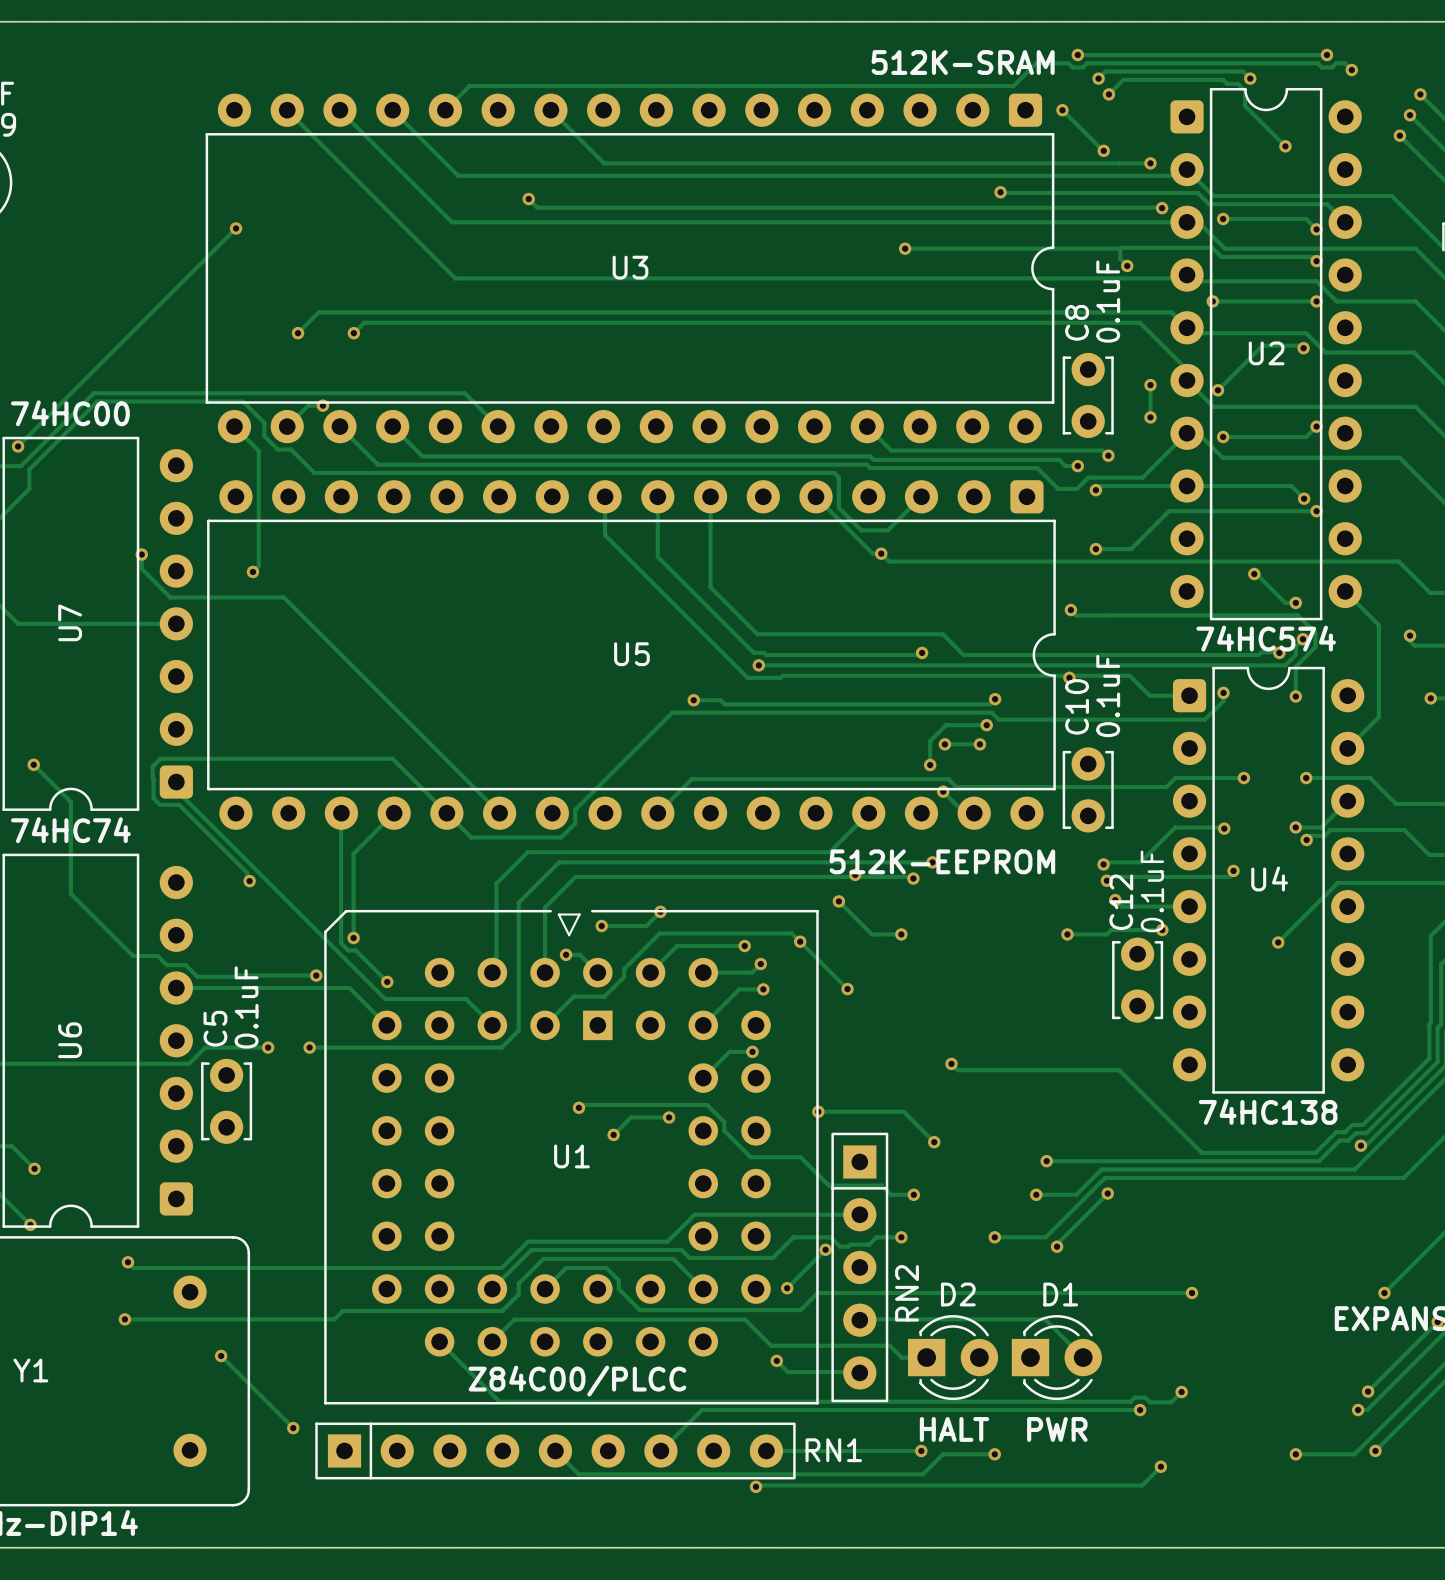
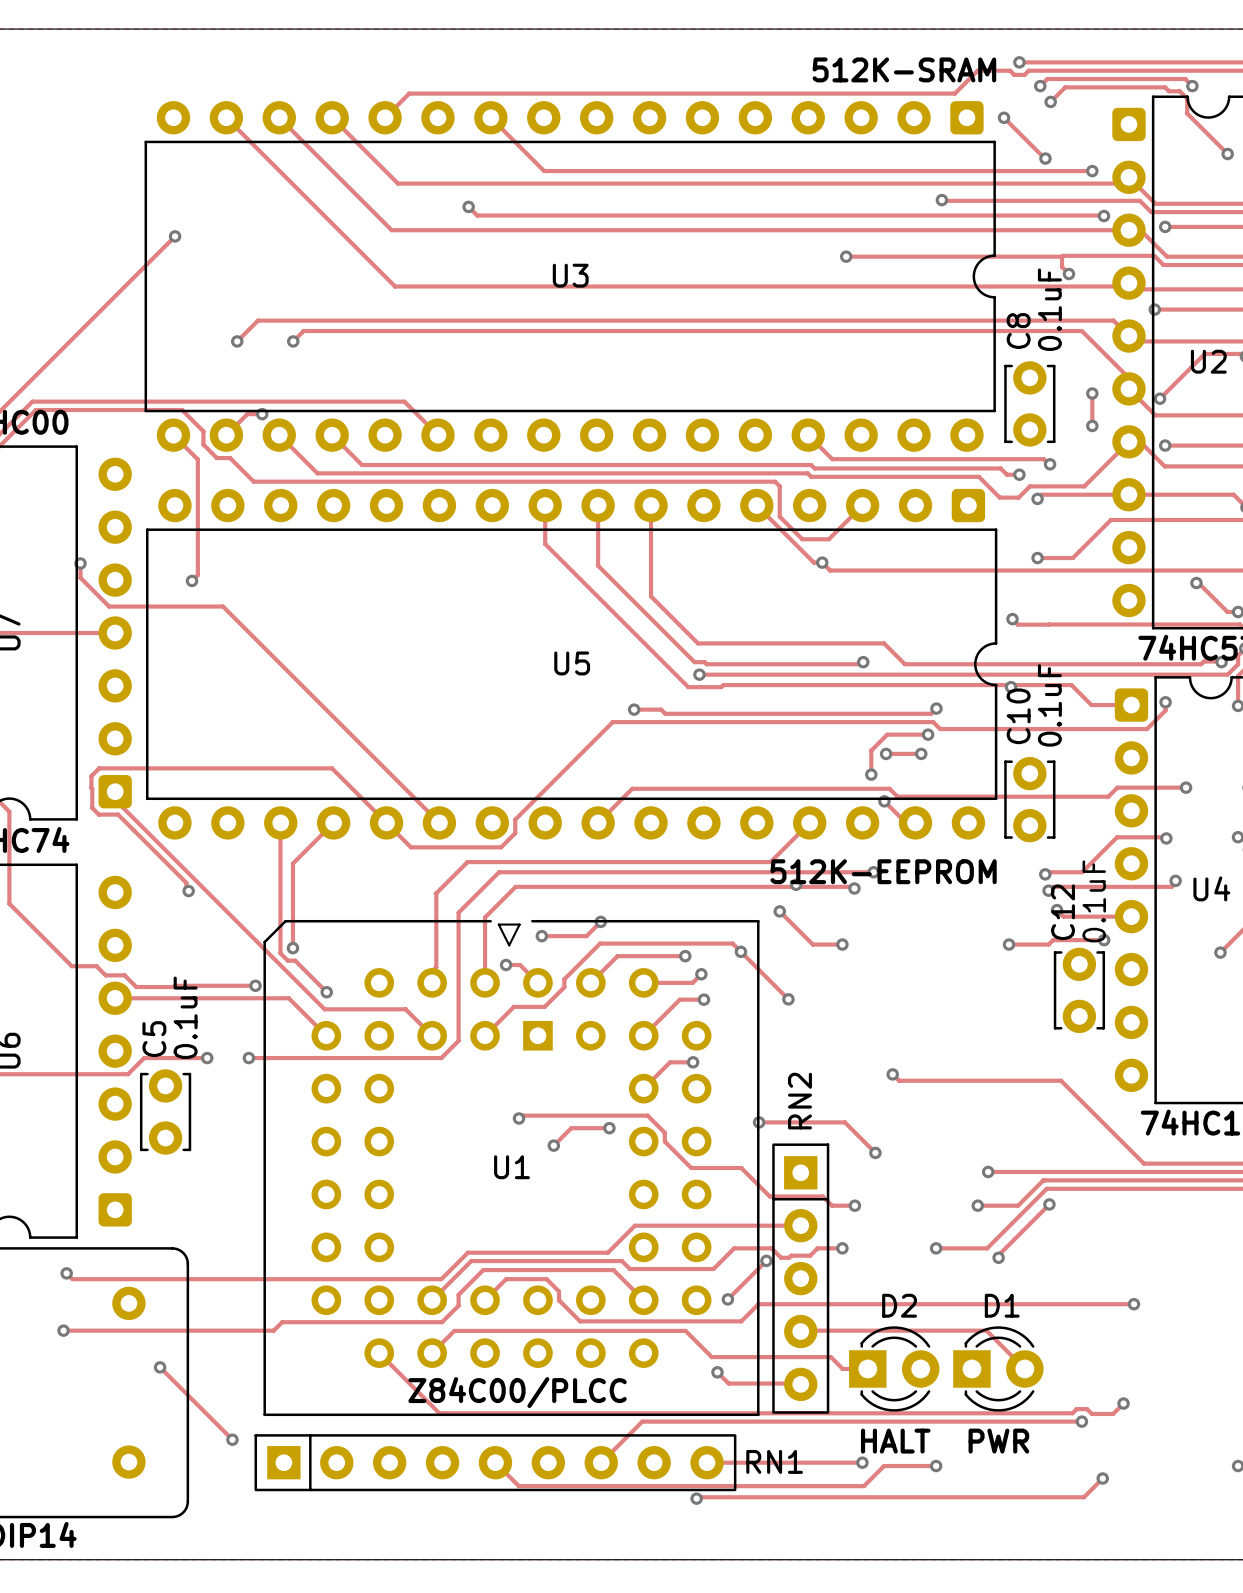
RN2 name position: RN2 (907, 1293) -> RN2 (799, 1101)

